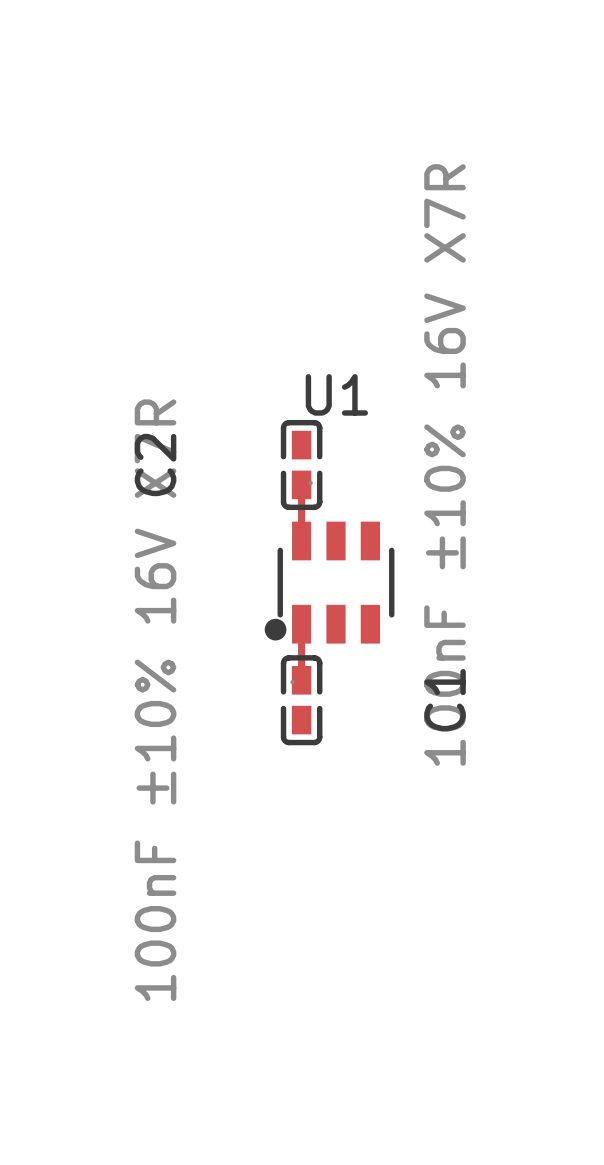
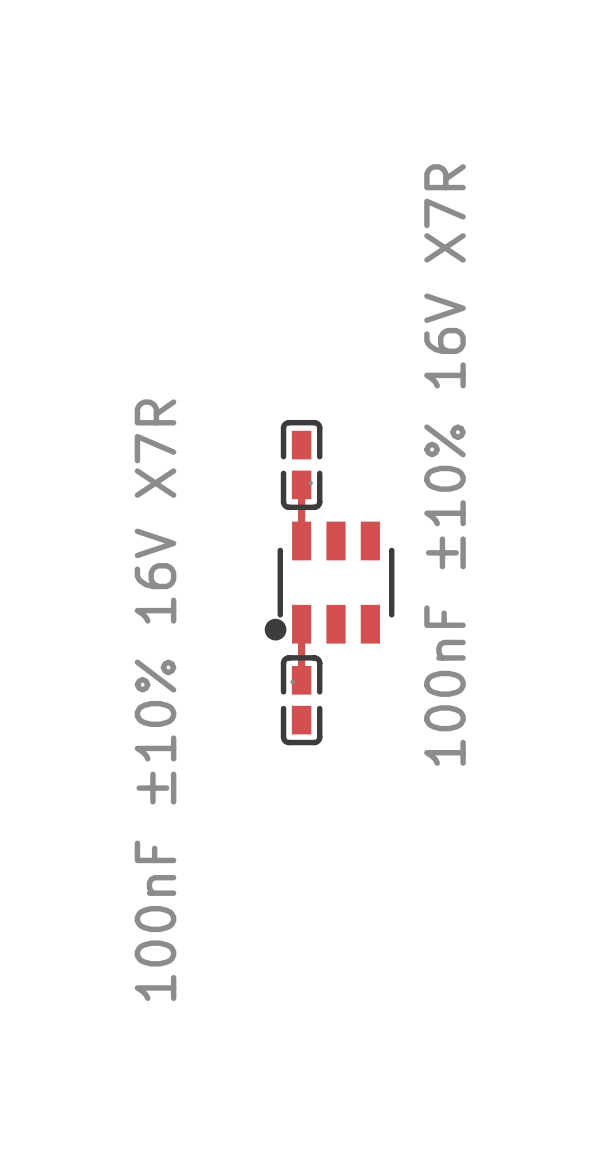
U1 name: U1 (336, 394) -> none
C2 name: C2 (155, 465) -> none
C1 name: C1 (445, 700) -> none

